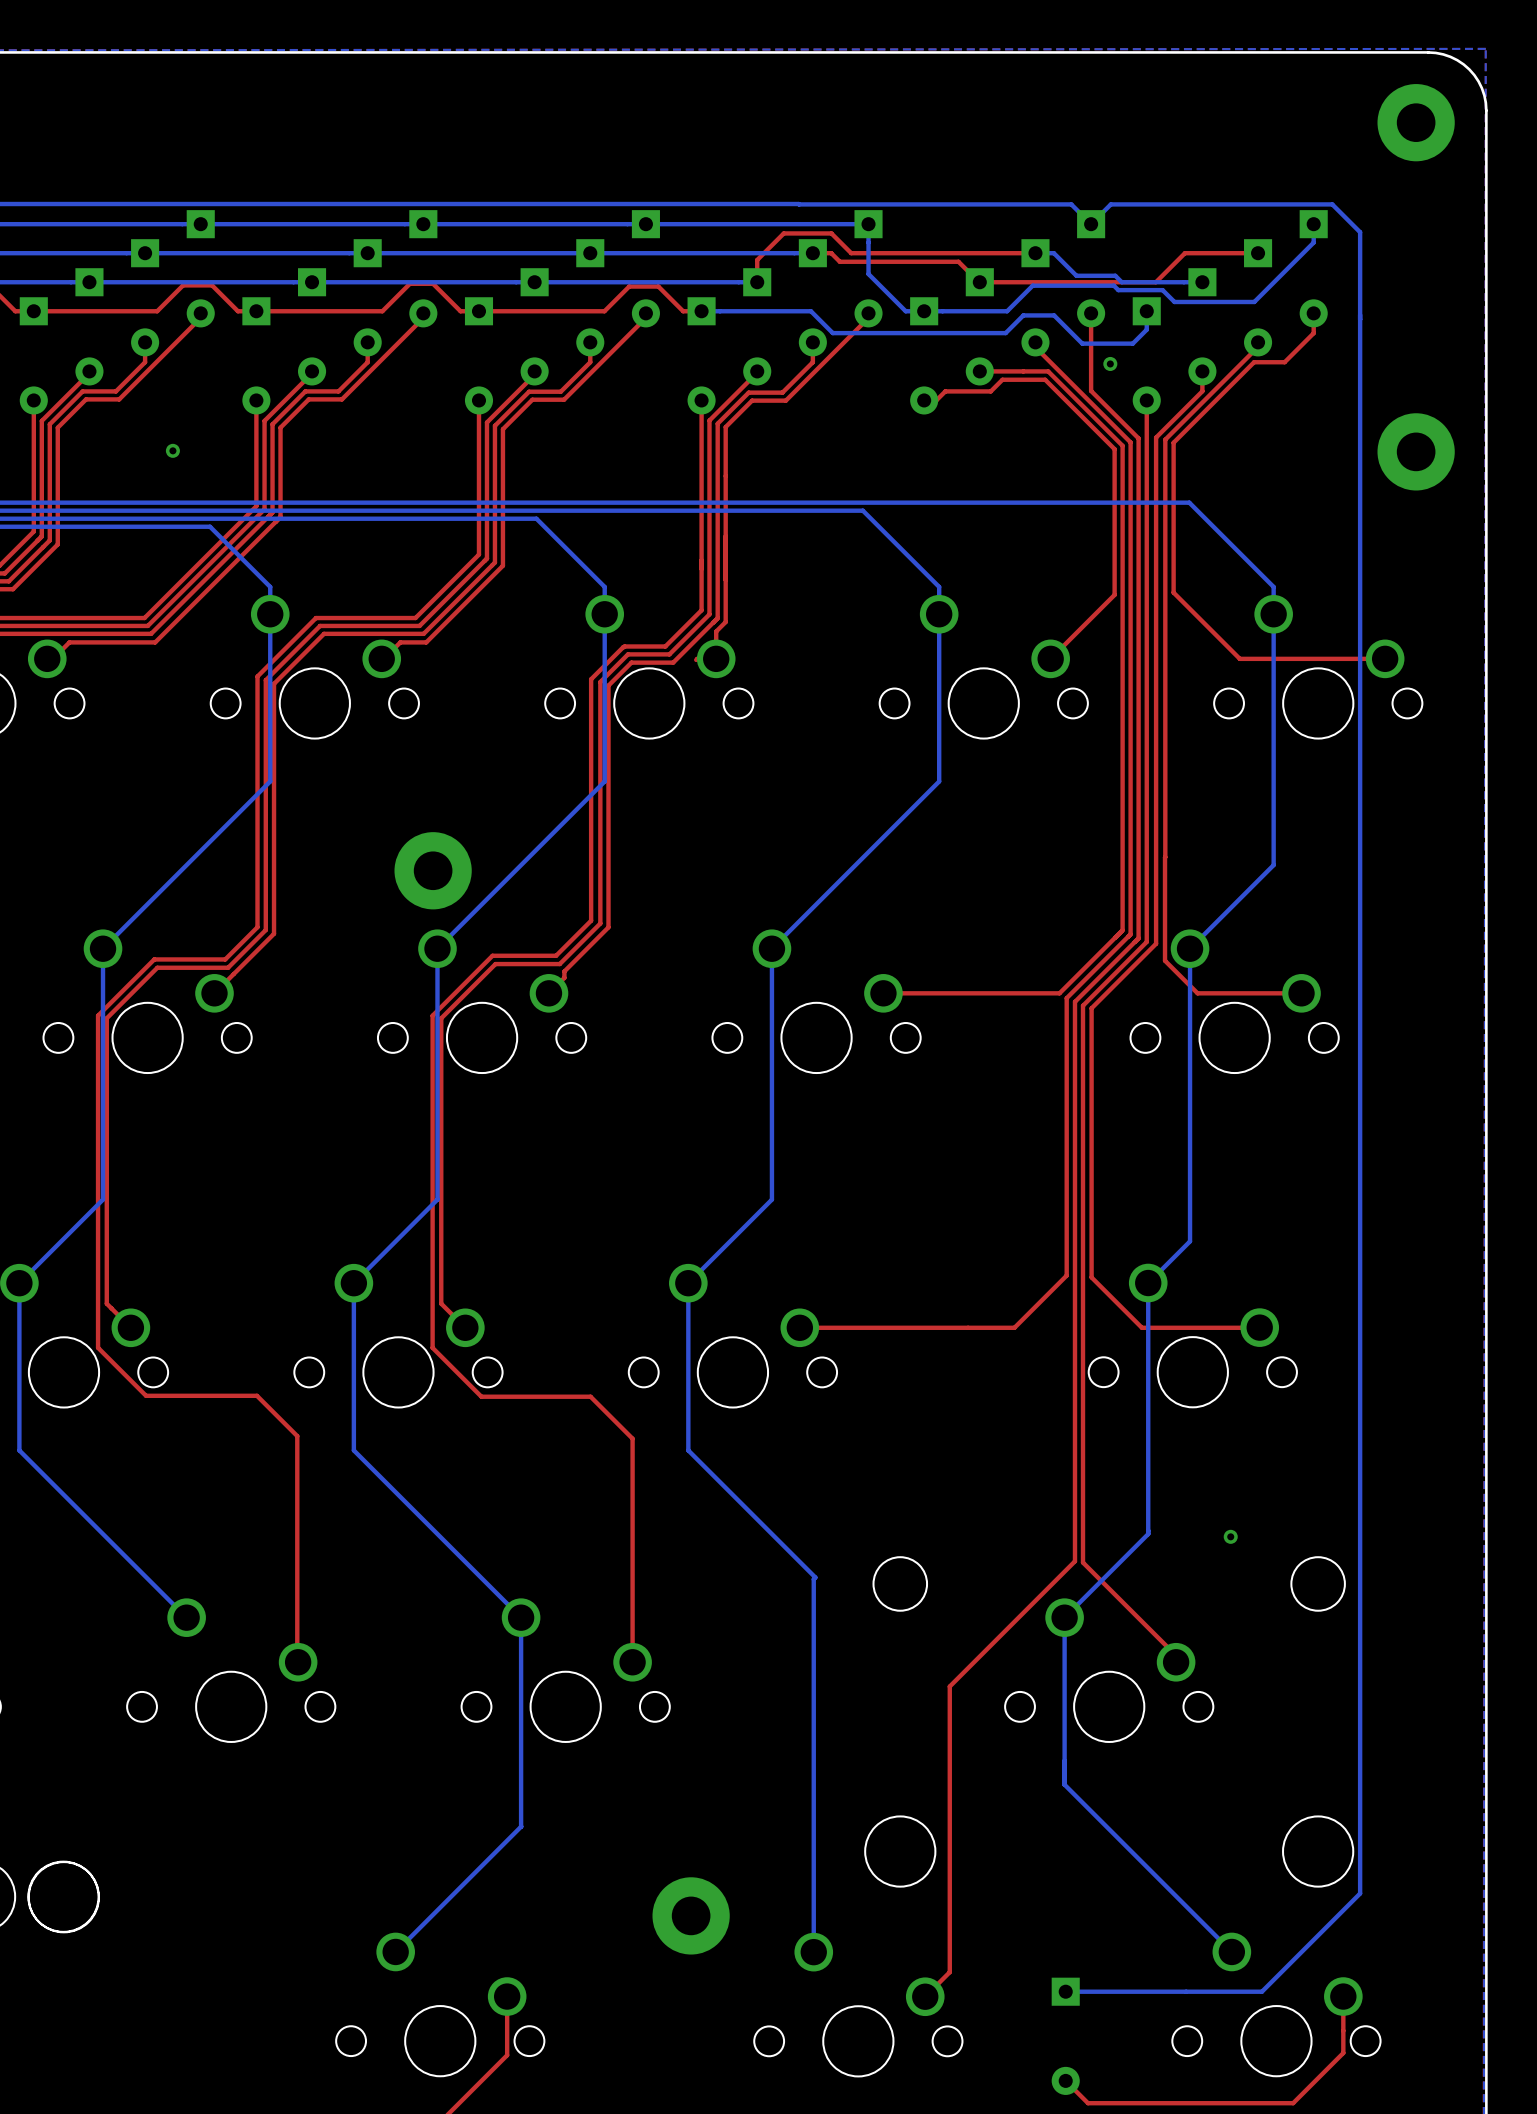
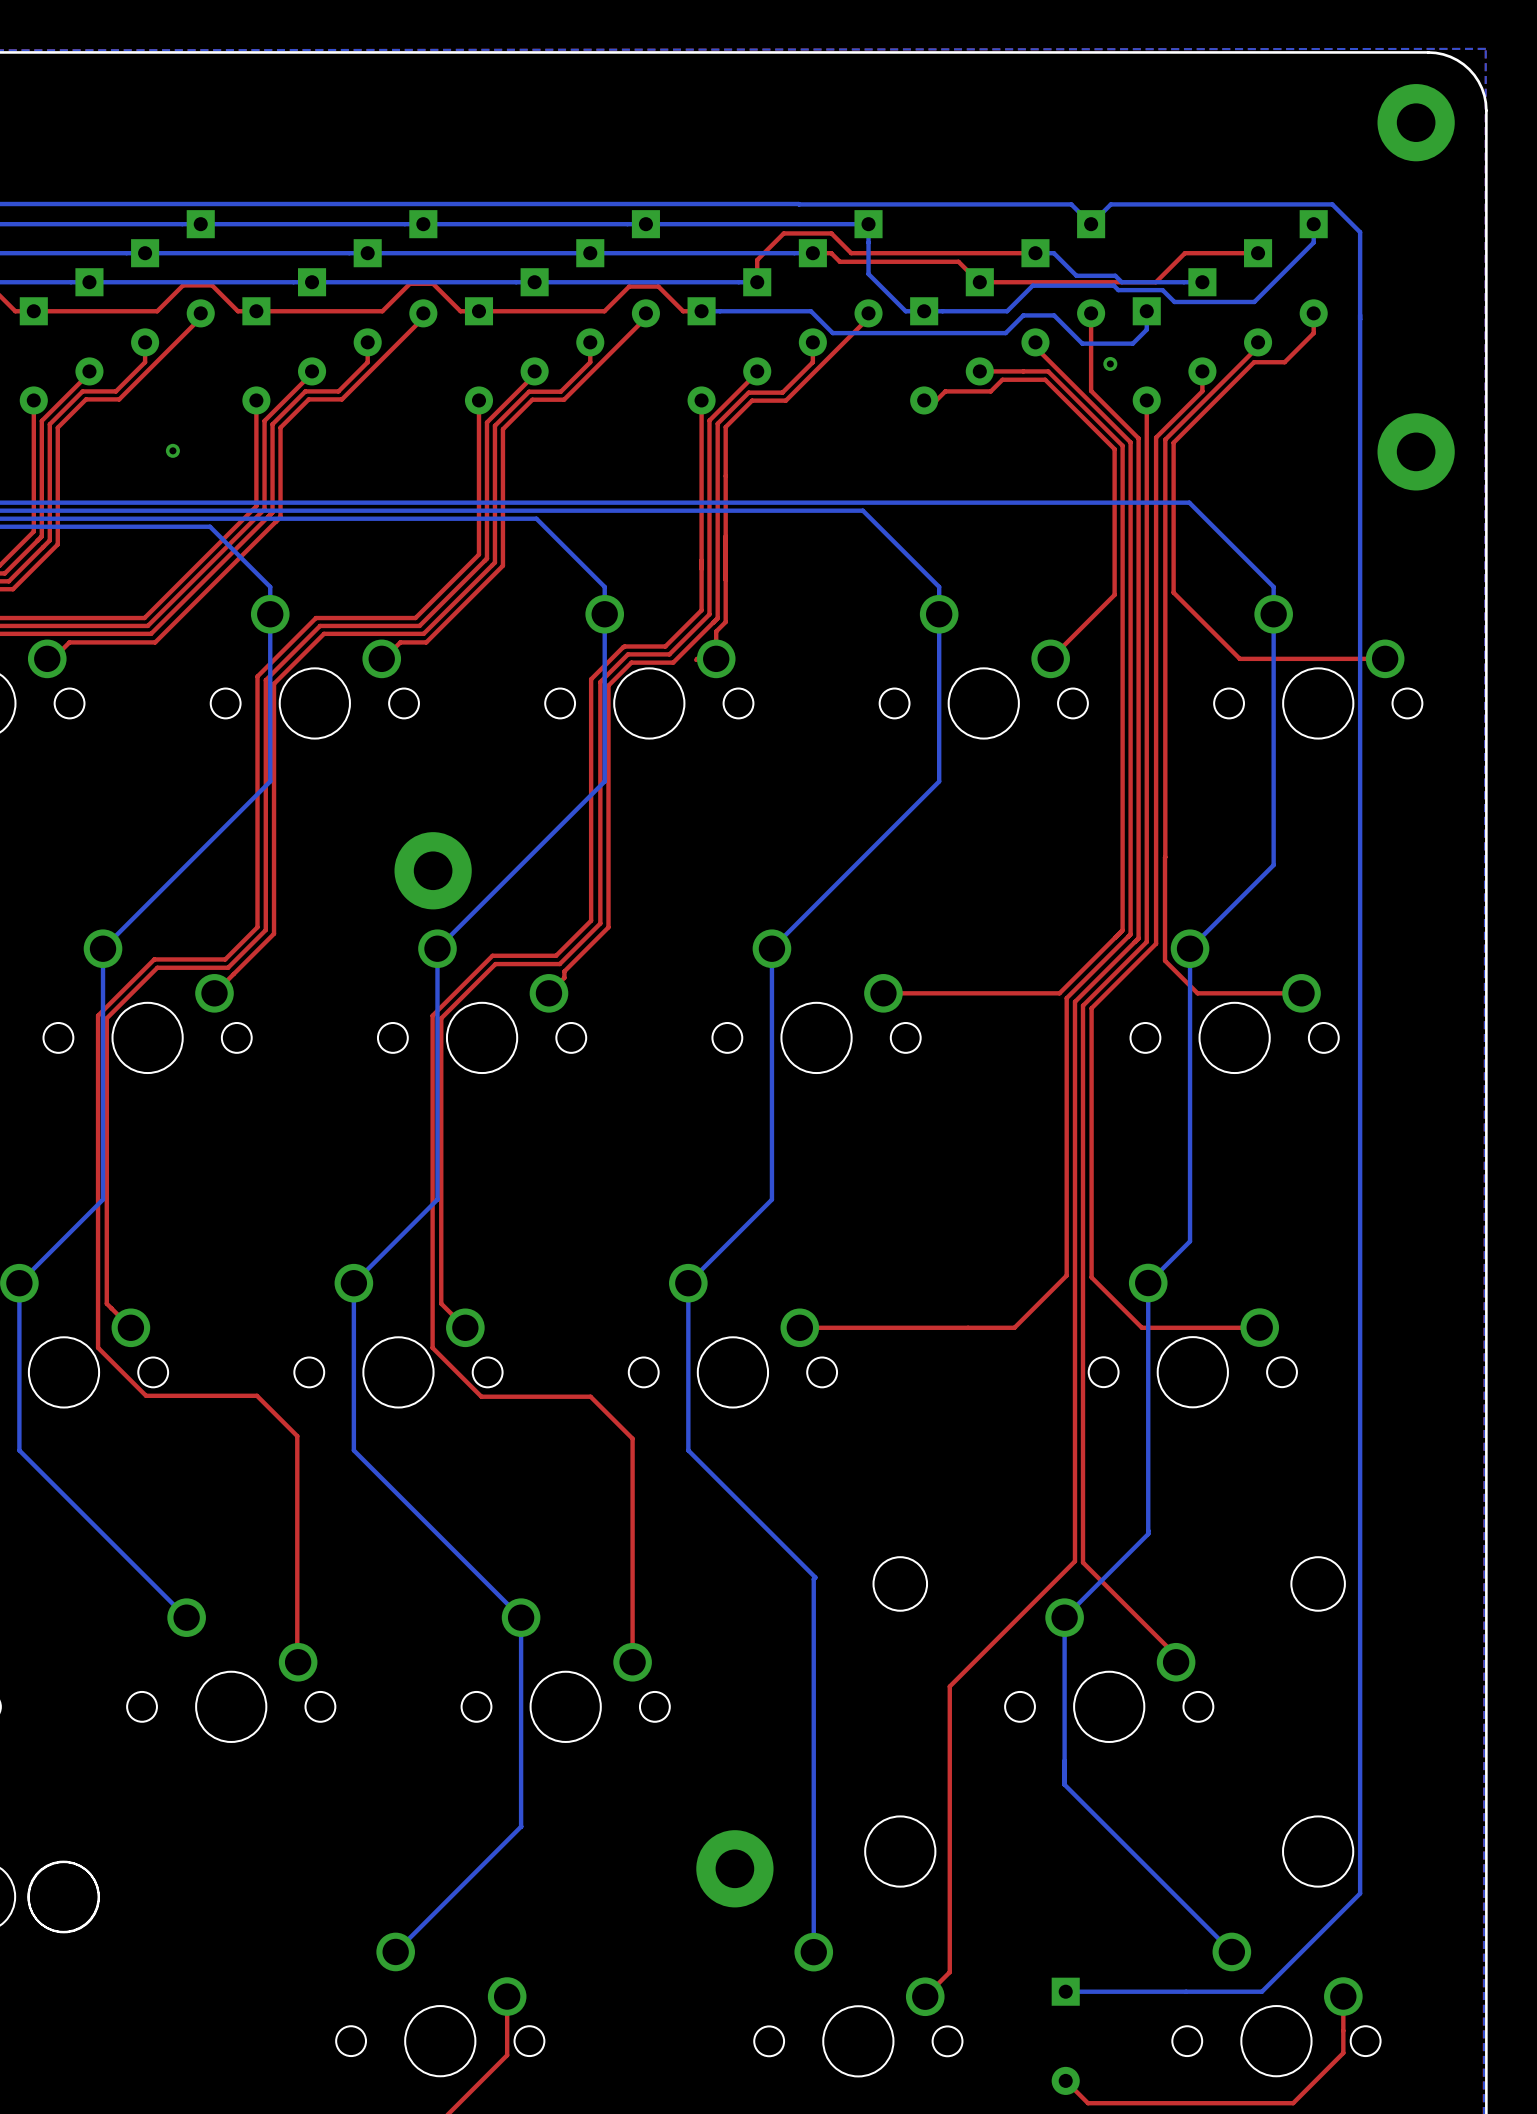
via: (1230, 1536) -> none
part position: (691, 1915) -> (734, 1868)

